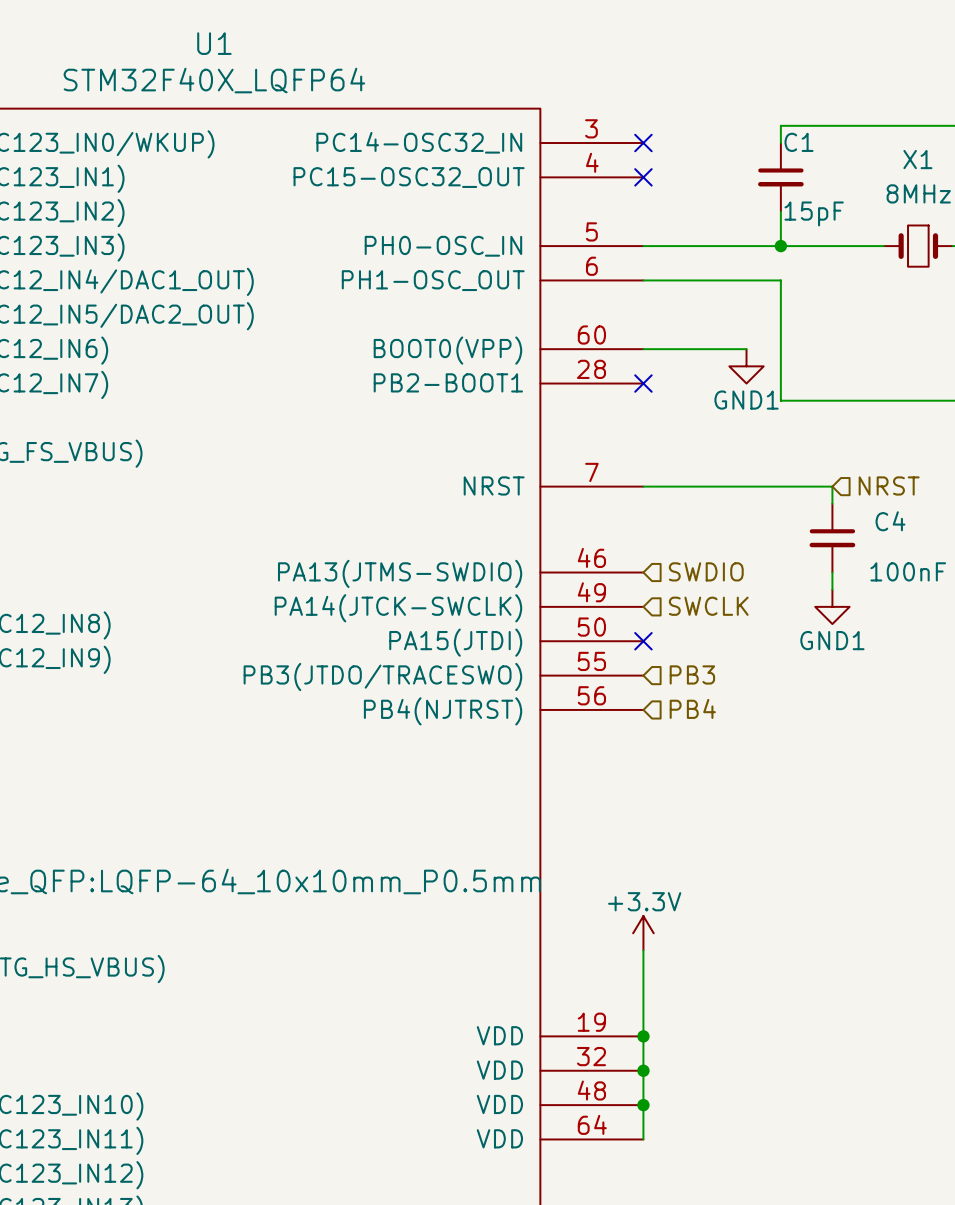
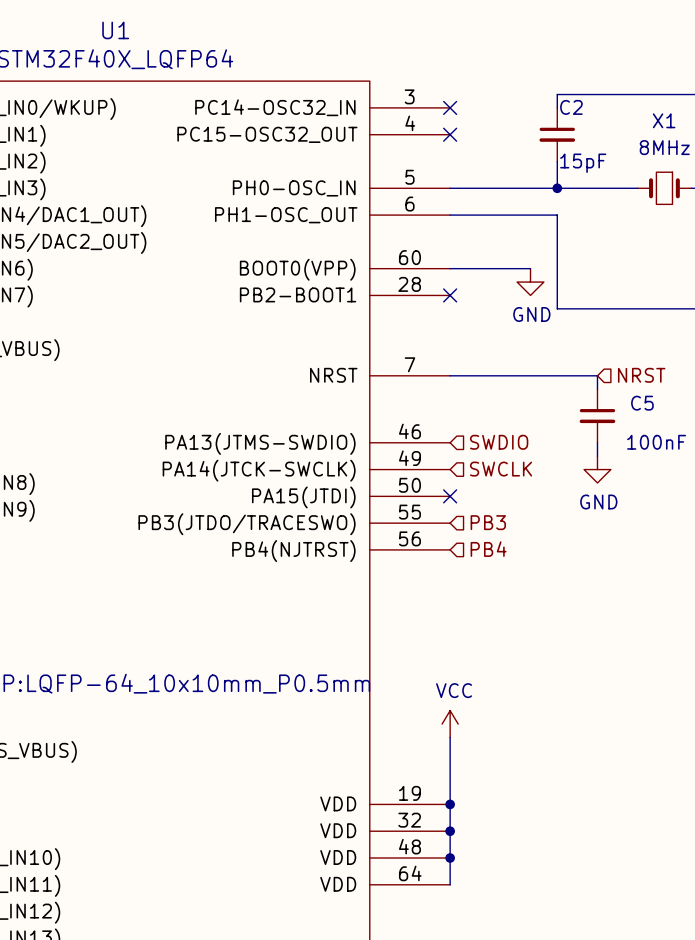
C1 name: C1 (799, 142) -> C2 (571, 107)
power symbol: GND1 (746, 366) -> GND (530, 282)
C4 name: C4 (890, 521) -> C5 (642, 403)
power symbol: GND1 (832, 606) -> GND (597, 469)
power symbol: +3.3V (643, 933) -> VCC (450, 724)

